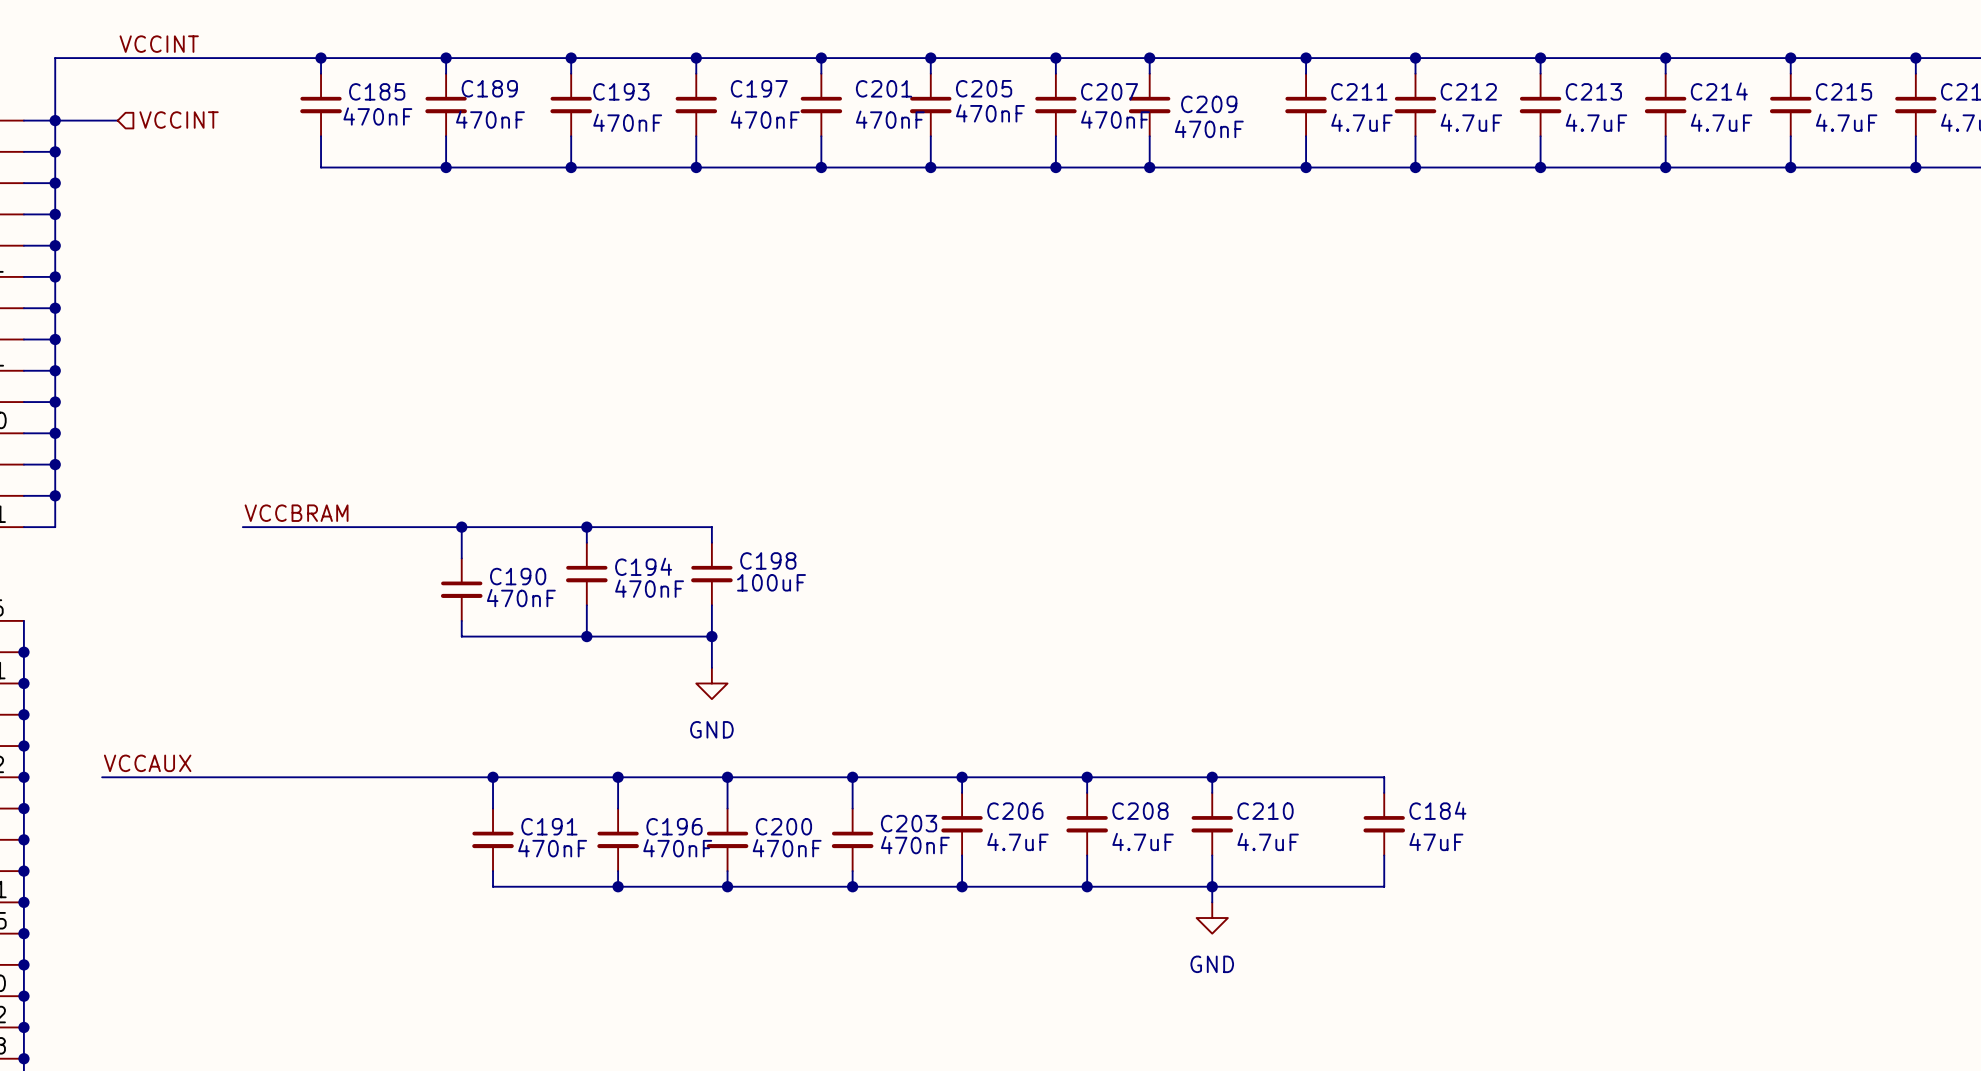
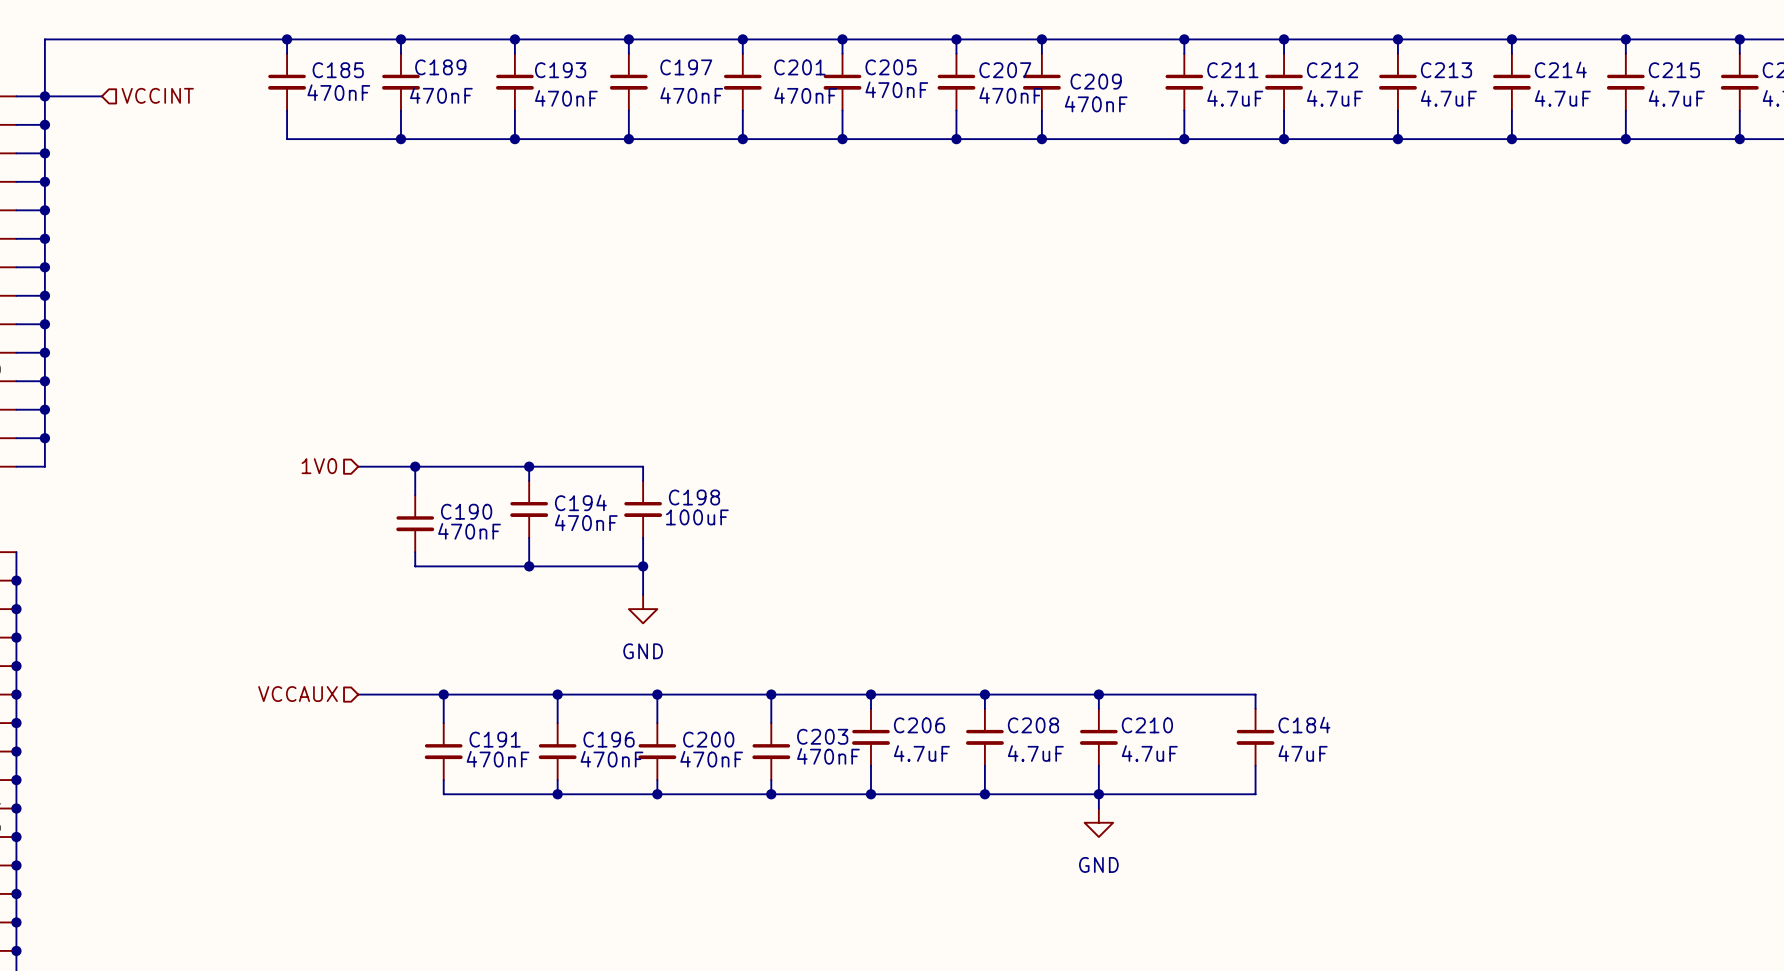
label: VCCINT (159, 44) -> none
label: VCCBRAM (296, 513) -> none
hierarchical label: none -> 1V0 (319, 466)
wire: (242, 527) (399, 527) -> none
label: VCCAUX (147, 763) -> none
hierarchical label: none -> VCCAUX (298, 694)
wire: (102, 777) (399, 777) -> none

